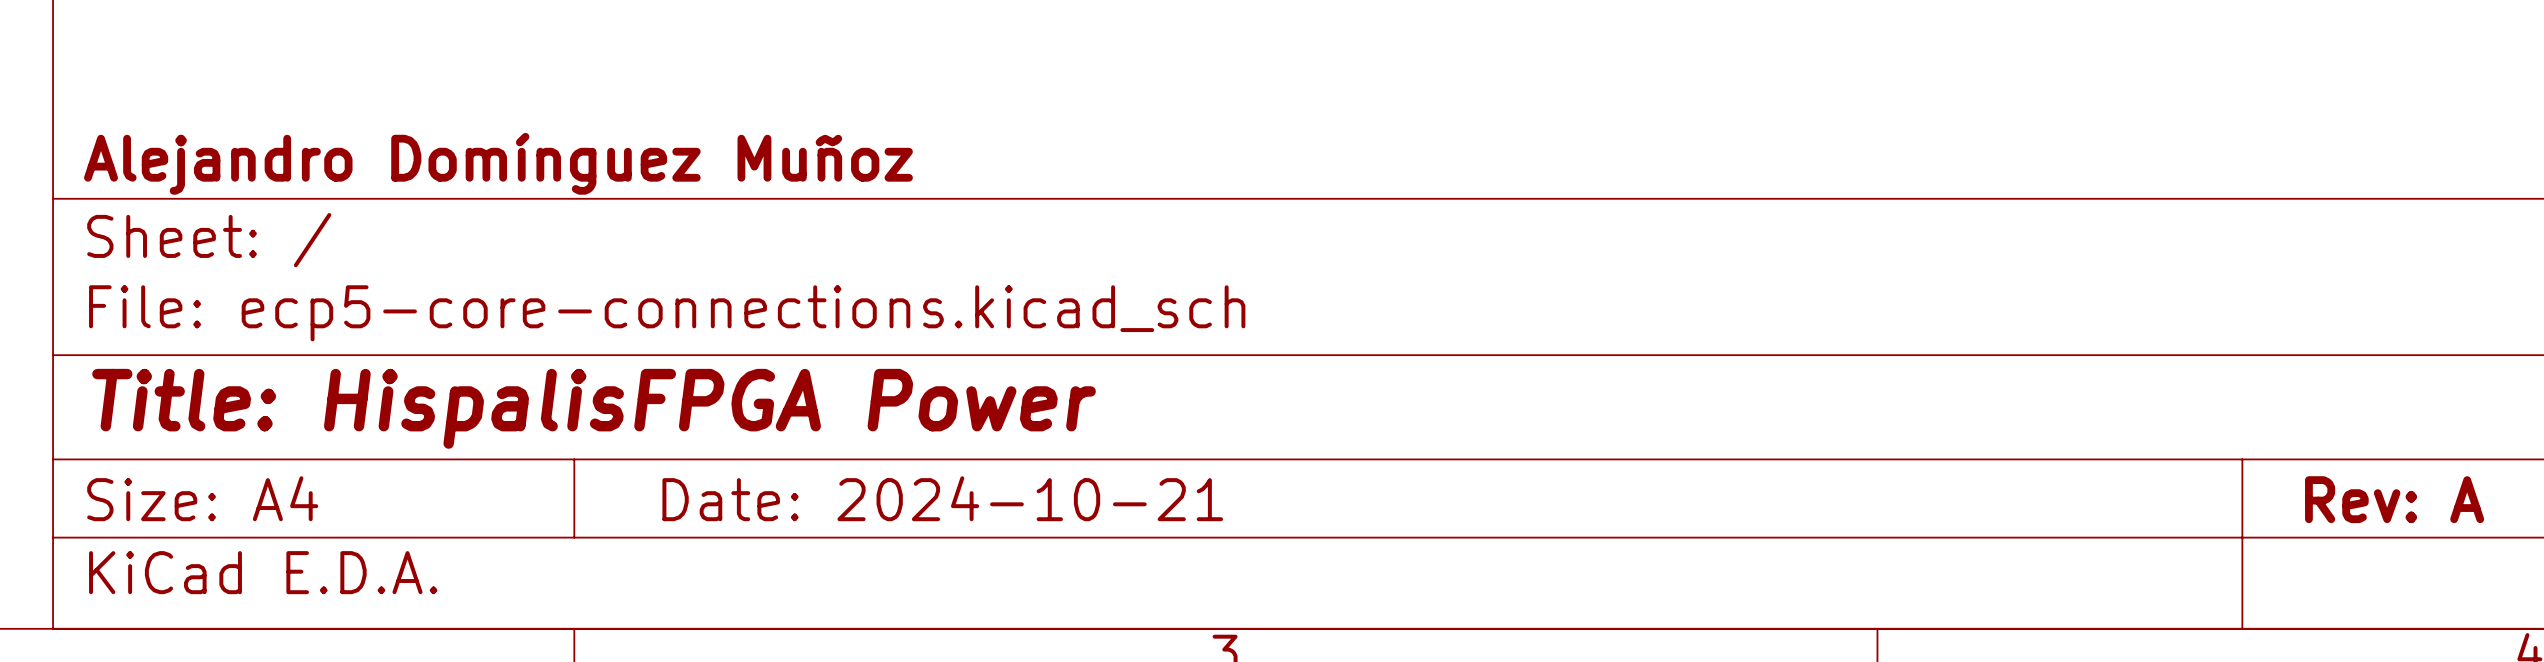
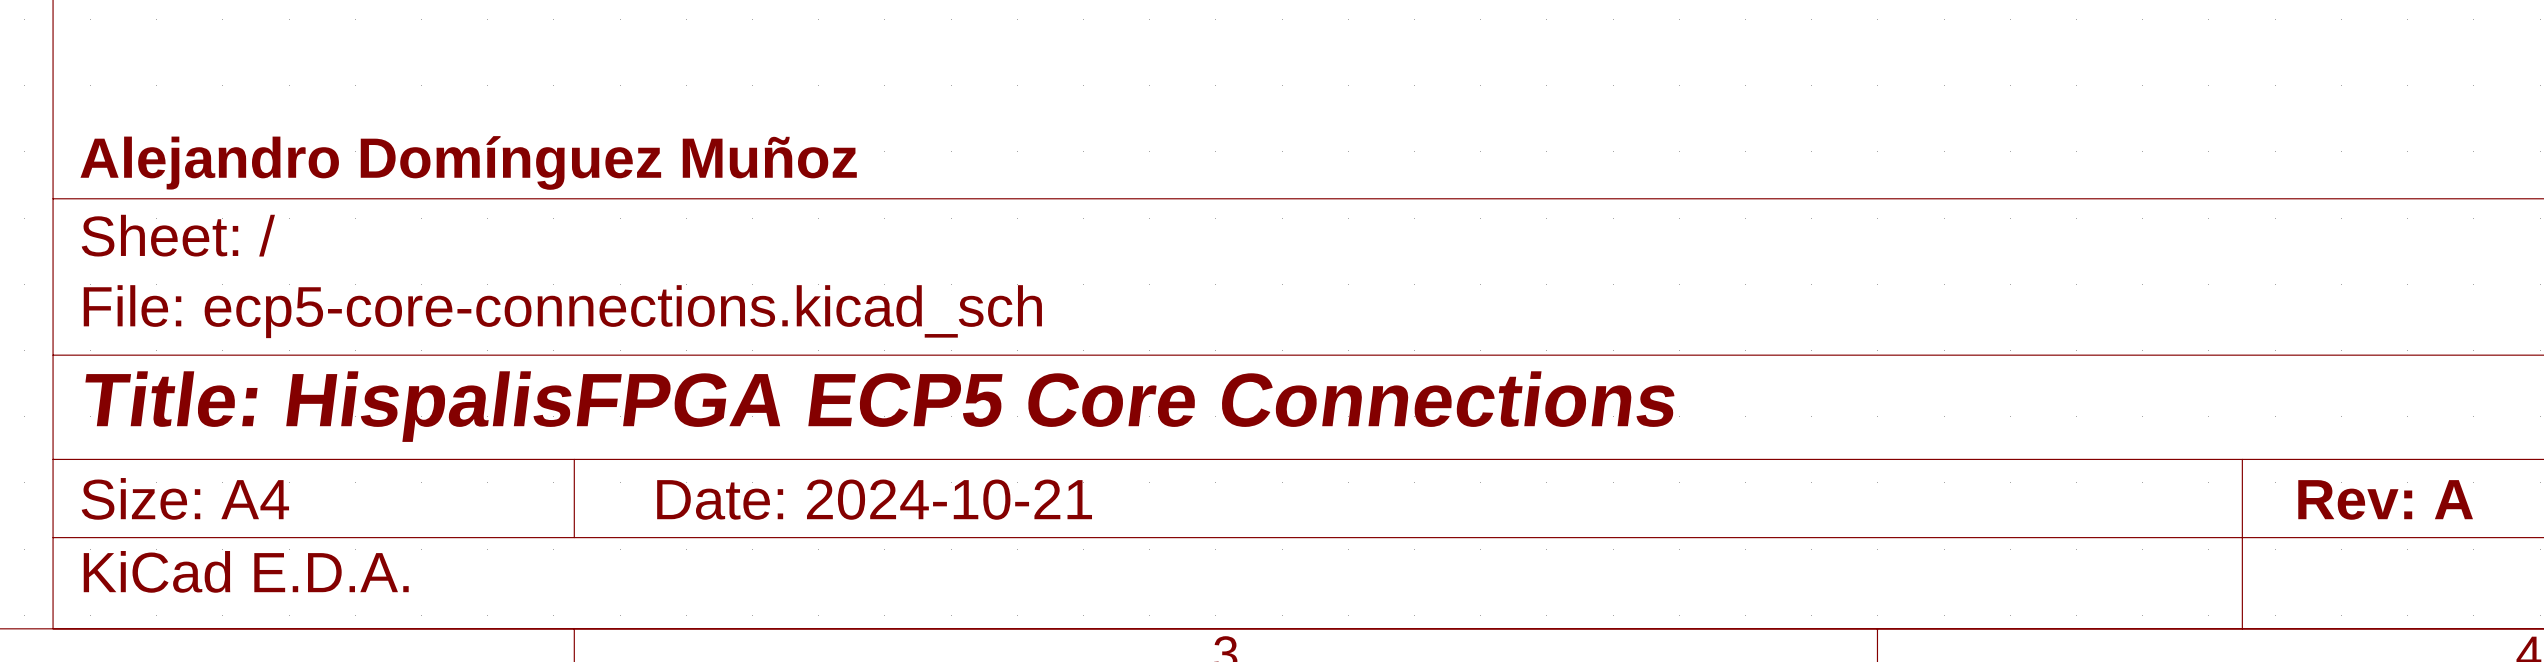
title block: Title: HispalisFPGA Power (594, 408) -> Title: HispalisFPGA ECP5 Core Connections (879, 406)

